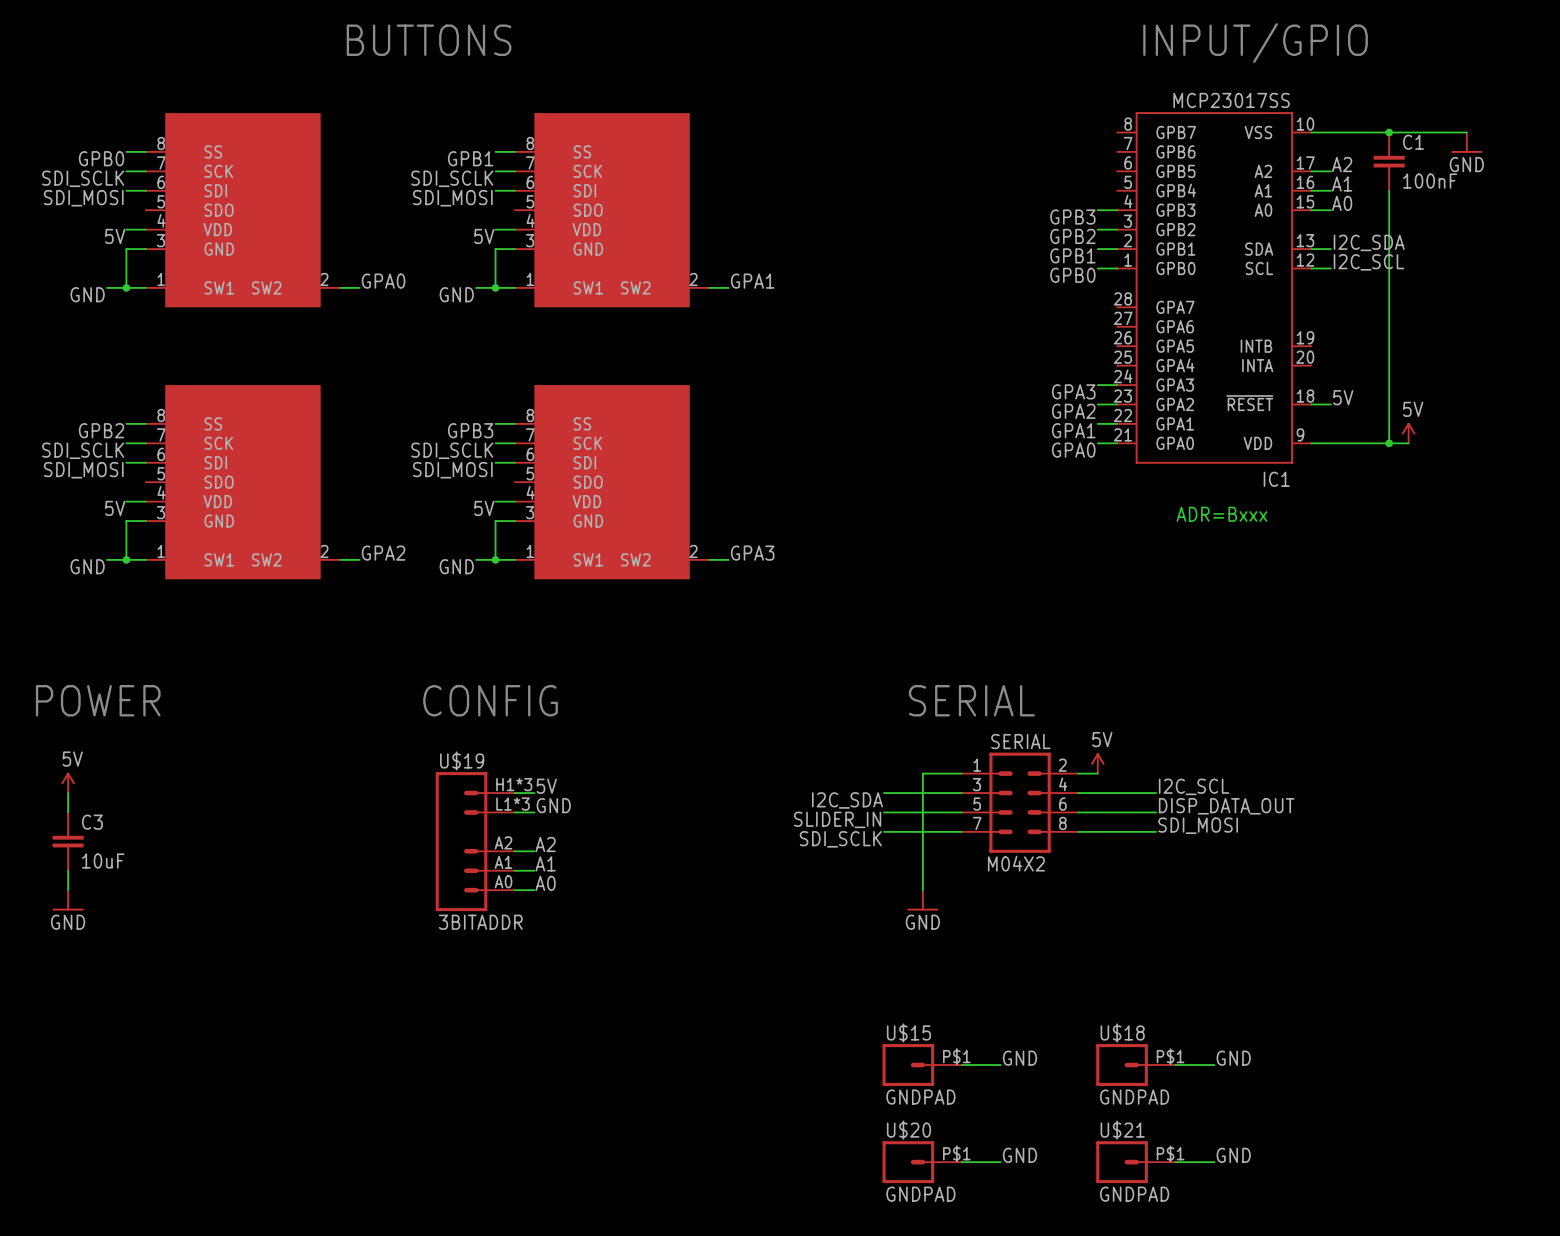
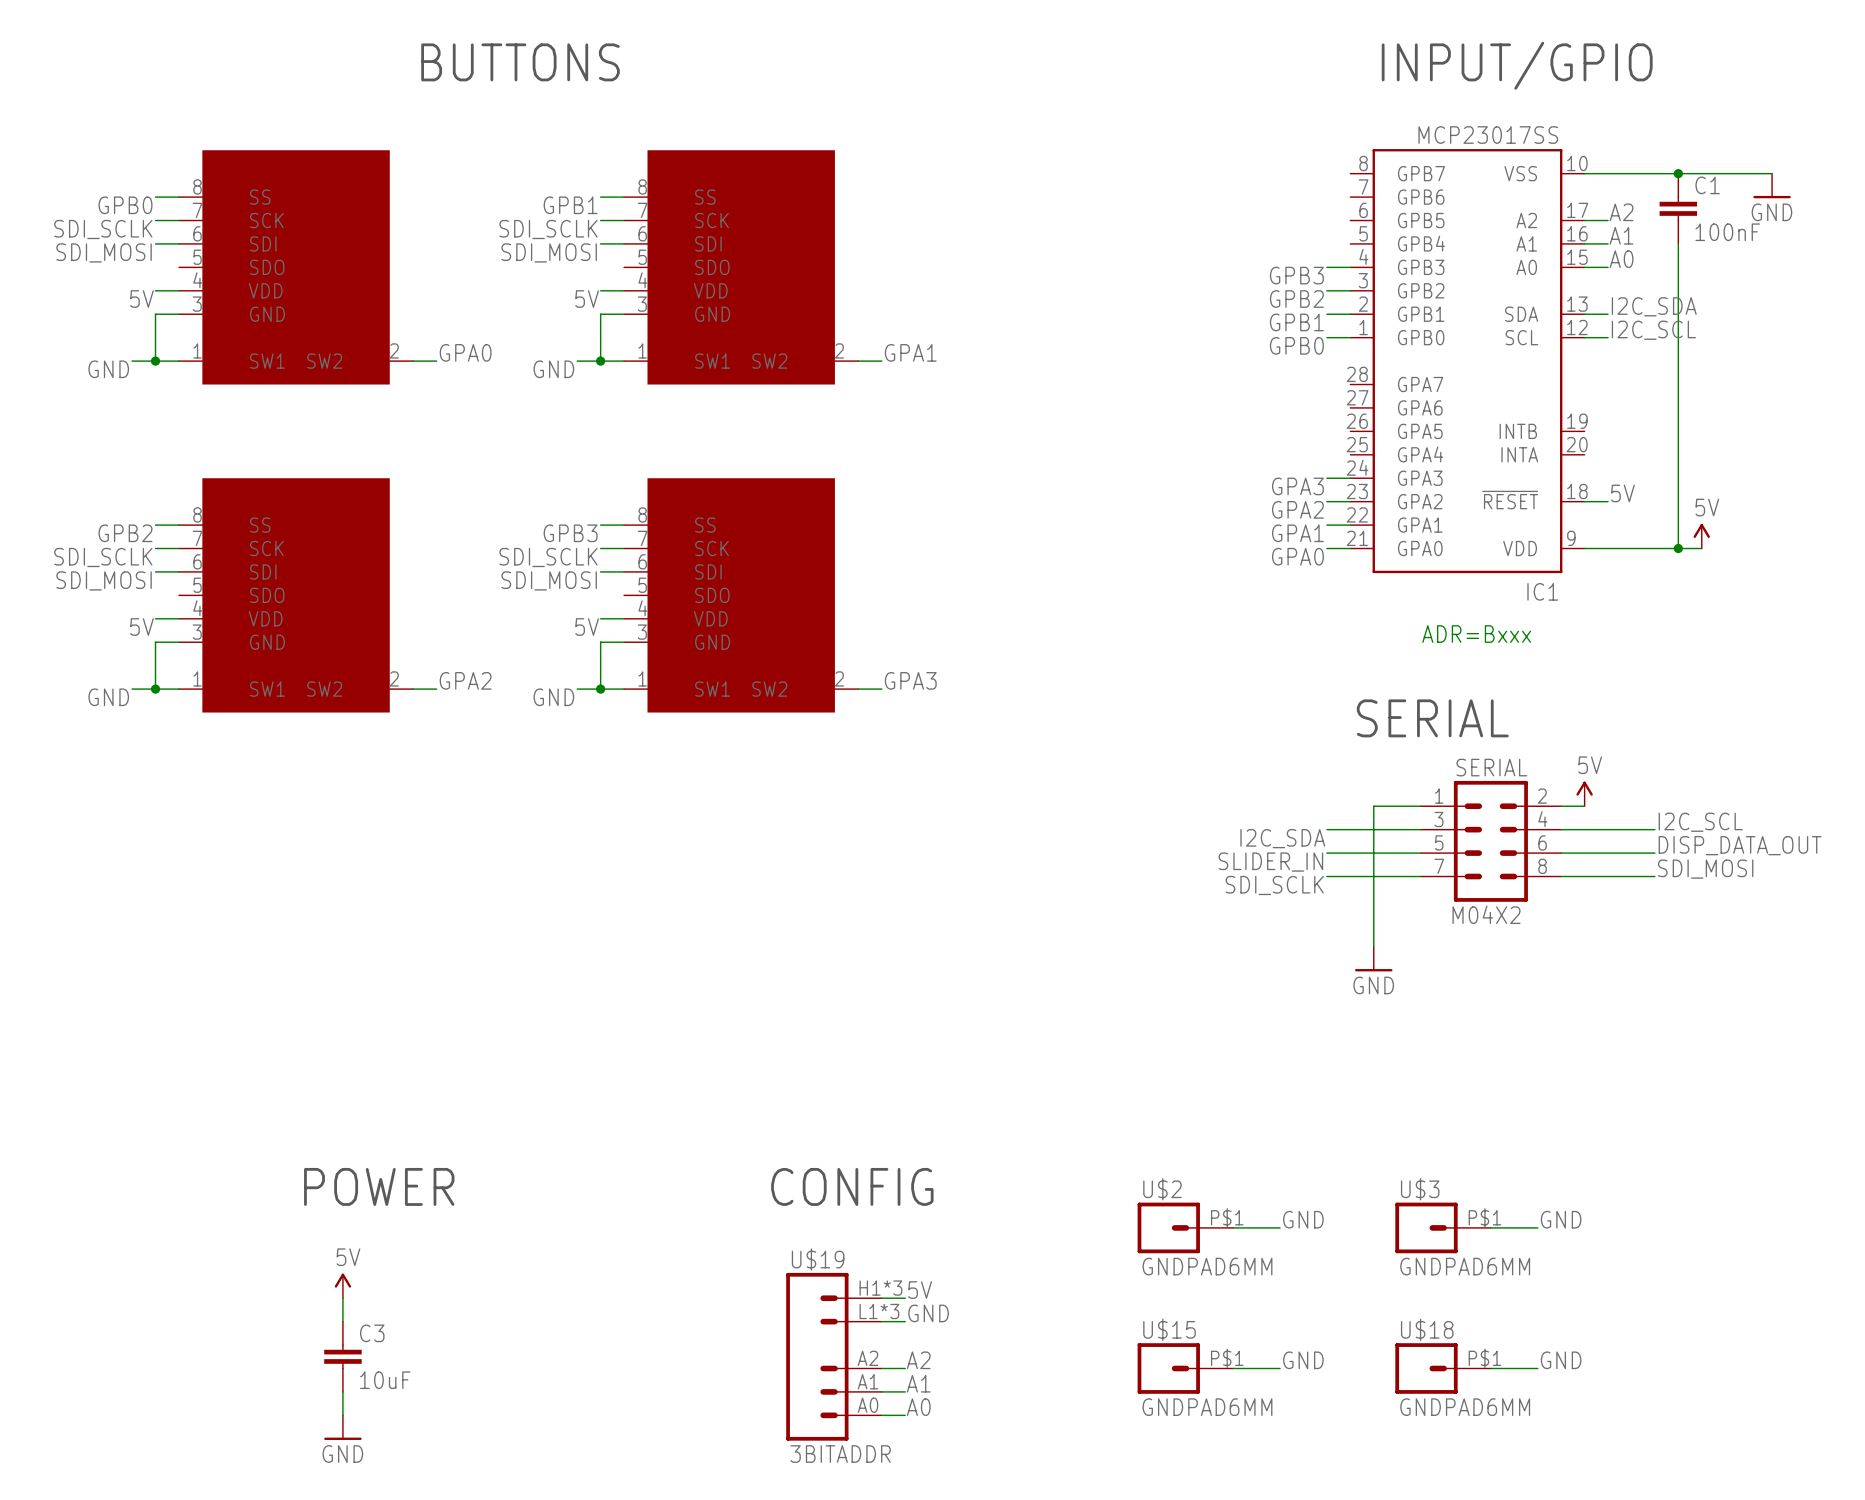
text: none -> SERIAL (1432, 718)
power symbol: none -> 5V (1584, 793)
wire: none -> (1420, 806) (1373, 806) (1373, 946)
wire: none -> (1561, 806) (1584, 806)
label: none -> I2C_SCL (1700, 822)
wire: none -> (1561, 829) (1654, 829)
label: none -> I2C_SDA (1282, 838)
SERIAL: none -> M04X2 (1490, 841)
label: none -> DISP_DATA_OUT (1740, 845)
wire: none -> (1561, 853) (1654, 853)
text: POWER (98, 700) -> none
text: CONFIG (490, 700) -> none
text: SERIAL (971, 700) -> none
label: none -> SLIDER_IN (1270, 862)
label: none -> SDI_MOSI (1705, 869)
wire: none -> (1561, 876) (1654, 876)
label: none -> SDI_SCLK (1274, 885)
power symbol: 5V (1097, 763) -> none
wire: (961, 773) (922, 773) (922, 890) -> none
wire: (1078, 773) (1097, 773) -> none
power symbol: 5V (68, 782) -> none
power symbol: none -> GND (1373, 959)
label: 5V (546, 786) -> none
label: I2C_SCL (1194, 786) -> none
wire: (68, 793) (68, 812) -> none
wire: (514, 793) (534, 793) -> none
wire: (884, 793) (961, 793) -> none
wire: (1078, 793) (1156, 793) -> (1326, 829) (1420, 829)
label: I2C_SDA (847, 800) -> none
SERIAL: M04X2 (1020, 802) -> none
label: GND (553, 805) -> none
label: DISP_DATA_OUT (1226, 806) -> none
wire: (514, 812) (534, 812) -> none
wire: (884, 812) (961, 812) -> none
wire: (1078, 812) (1156, 812) -> (1326, 853) (1420, 853)
label: SLIDER_IN (837, 819) -> none
label: SDI_MOSI (1198, 825) -> none
wire: (884, 831) (961, 831) -> none
wire: (1078, 831) (1156, 831) -> (1326, 876) (1420, 876)
label: SDI_SCLK (840, 839) -> none
C3 position: (68, 841) -> (342, 1356)
U$19 position: (475, 841) -> (833, 1356)
label: A2 (545, 844) -> none
wire: (514, 851) (534, 851) -> none
label: A1 (545, 863) -> none
wire: (68, 870) (68, 890) -> none
wire: (514, 870) (534, 870) -> none
label: A0 (545, 883) -> none
wire: (514, 890) (534, 890) -> none
power symbol: GND (68, 900) -> none
power symbol: GND (922, 900) -> none
text: none -> POWER (379, 1186)
text: none -> CONFIG (852, 1186)
label: none -> GND (1303, 1219)
label: none -> GND (1561, 1219)
U$2: none -> GNDPAD6MM (1185, 1227)
U$3: none -> GNDPAD6MM (1443, 1227)
power symbol: none -> 5V (342, 1285)
label: none -> 5V (920, 1290)
label: GND (1019, 1058) -> none
label: GND (1233, 1058) -> none
wire: none -> (342, 1298) (342, 1321)
wire: none -> (881, 1298) (905, 1298)
U$15 position: (922, 1065) -> (1185, 1368)
wire: (961, 1065) (1000, 1065) -> (1233, 1227) (1280, 1227)
U$18 position: (1135, 1065) -> (1443, 1368)
wire: (1175, 1065) (1214, 1065) -> (1490, 1227) (1537, 1227)
label: none -> GND (928, 1313)
wire: none -> (881, 1321) (905, 1321)
U$15 value: GNDPAD (920, 1097) -> GNDPAD6MM (1207, 1407)
U$18 value: GNDPAD (1134, 1097) -> GNDPAD6MM (1465, 1407)
label: none -> A2 (918, 1360)
label: none -> GND (1303, 1360)
label: none -> GND (1561, 1360)
wire: none -> (881, 1368) (905, 1368)
label: none -> A1 (918, 1383)
wire: none -> (342, 1391) (342, 1415)
wire: none -> (881, 1391) (905, 1391)
label: none -> A0 (918, 1407)
label: GND (1019, 1155) -> none
label: GND (1233, 1155) -> none
wire: none -> (881, 1415) (905, 1415)
U$20: GNDPAD (922, 1162) -> none
wire: (961, 1162) (1000, 1162) -> (1233, 1368) (1280, 1368)
U$21: GNDPAD (1135, 1162) -> none
wire: (1175, 1162) (1214, 1162) -> (1490, 1368) (1537, 1368)
power symbol: none -> GND (342, 1427)

